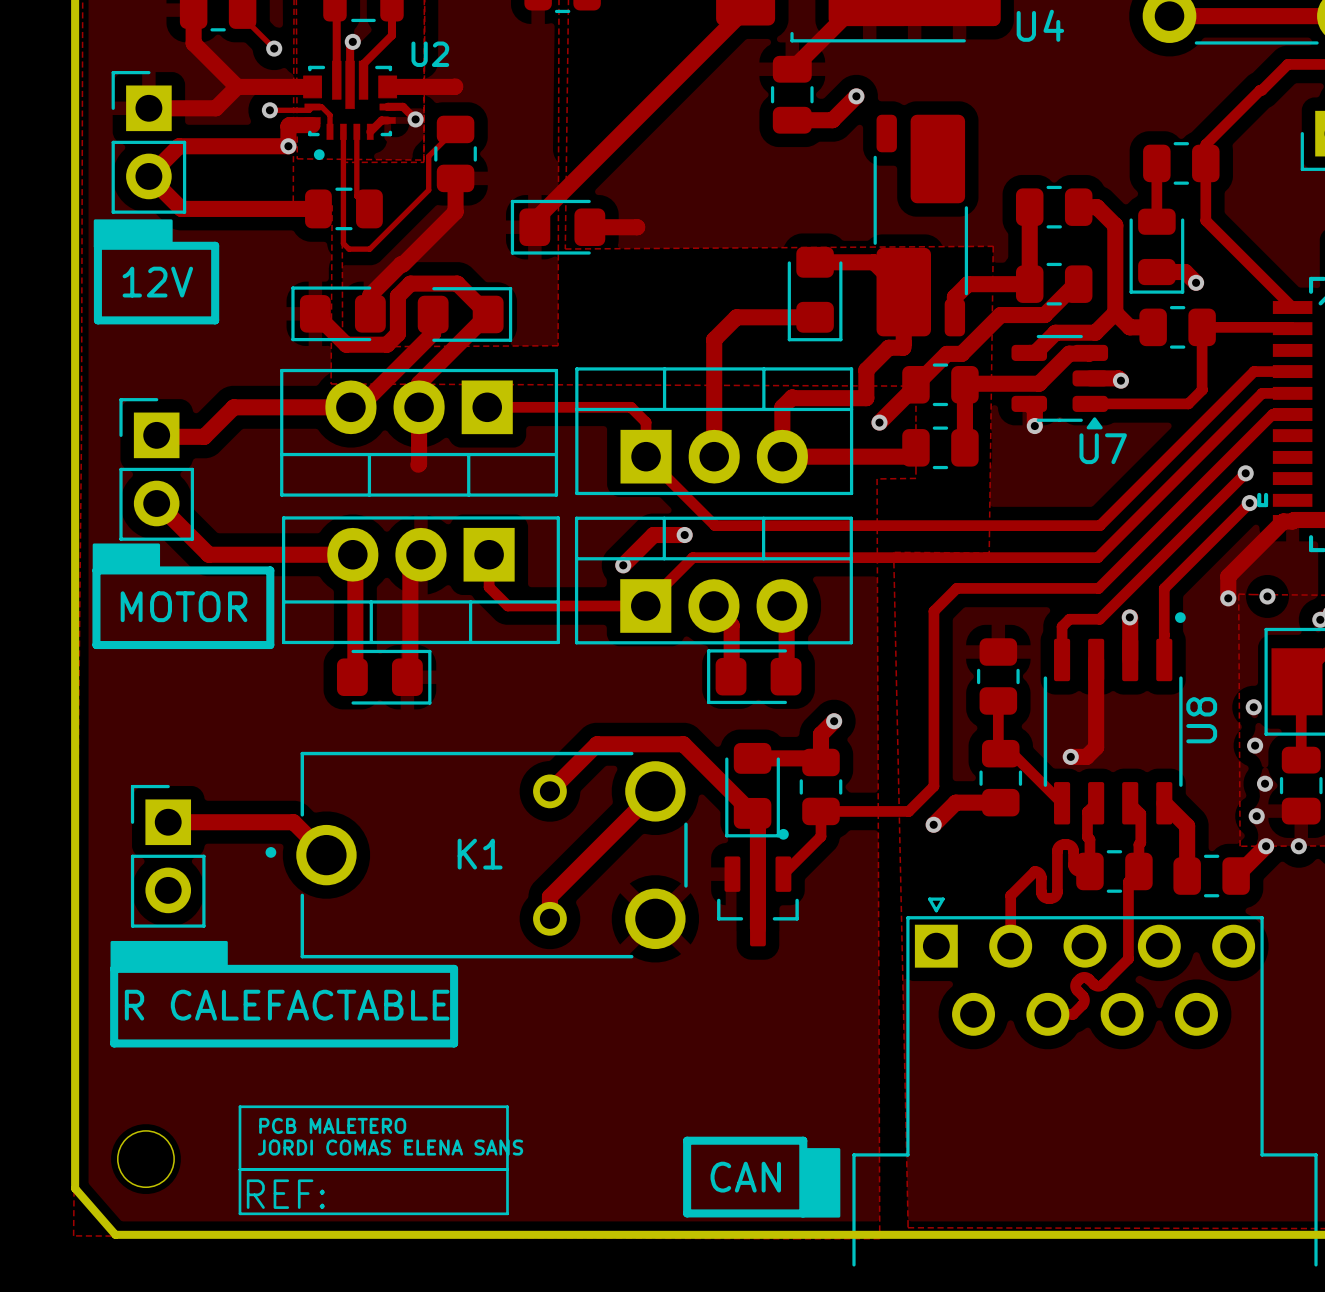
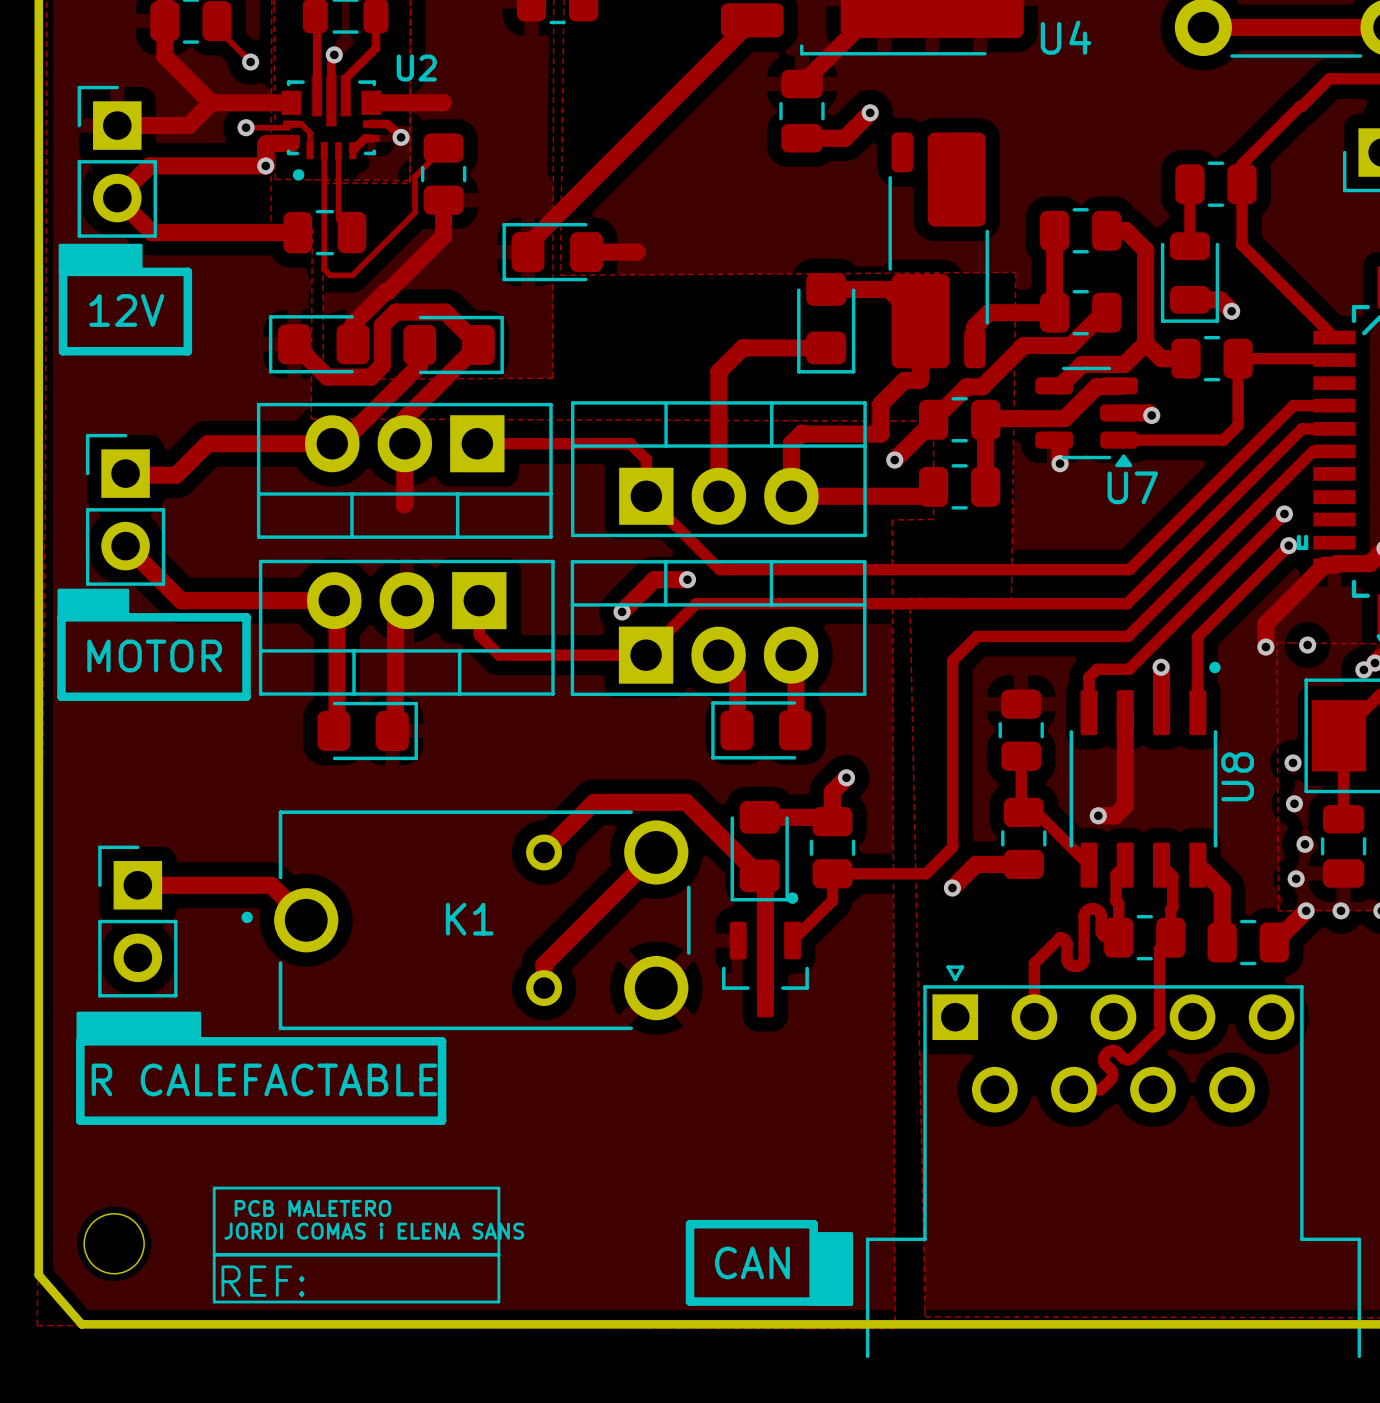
text: JORDI COMAS ELENA SANS (390, 1147) -> JORDI COMAS i ELENA SANS (374, 1231)

